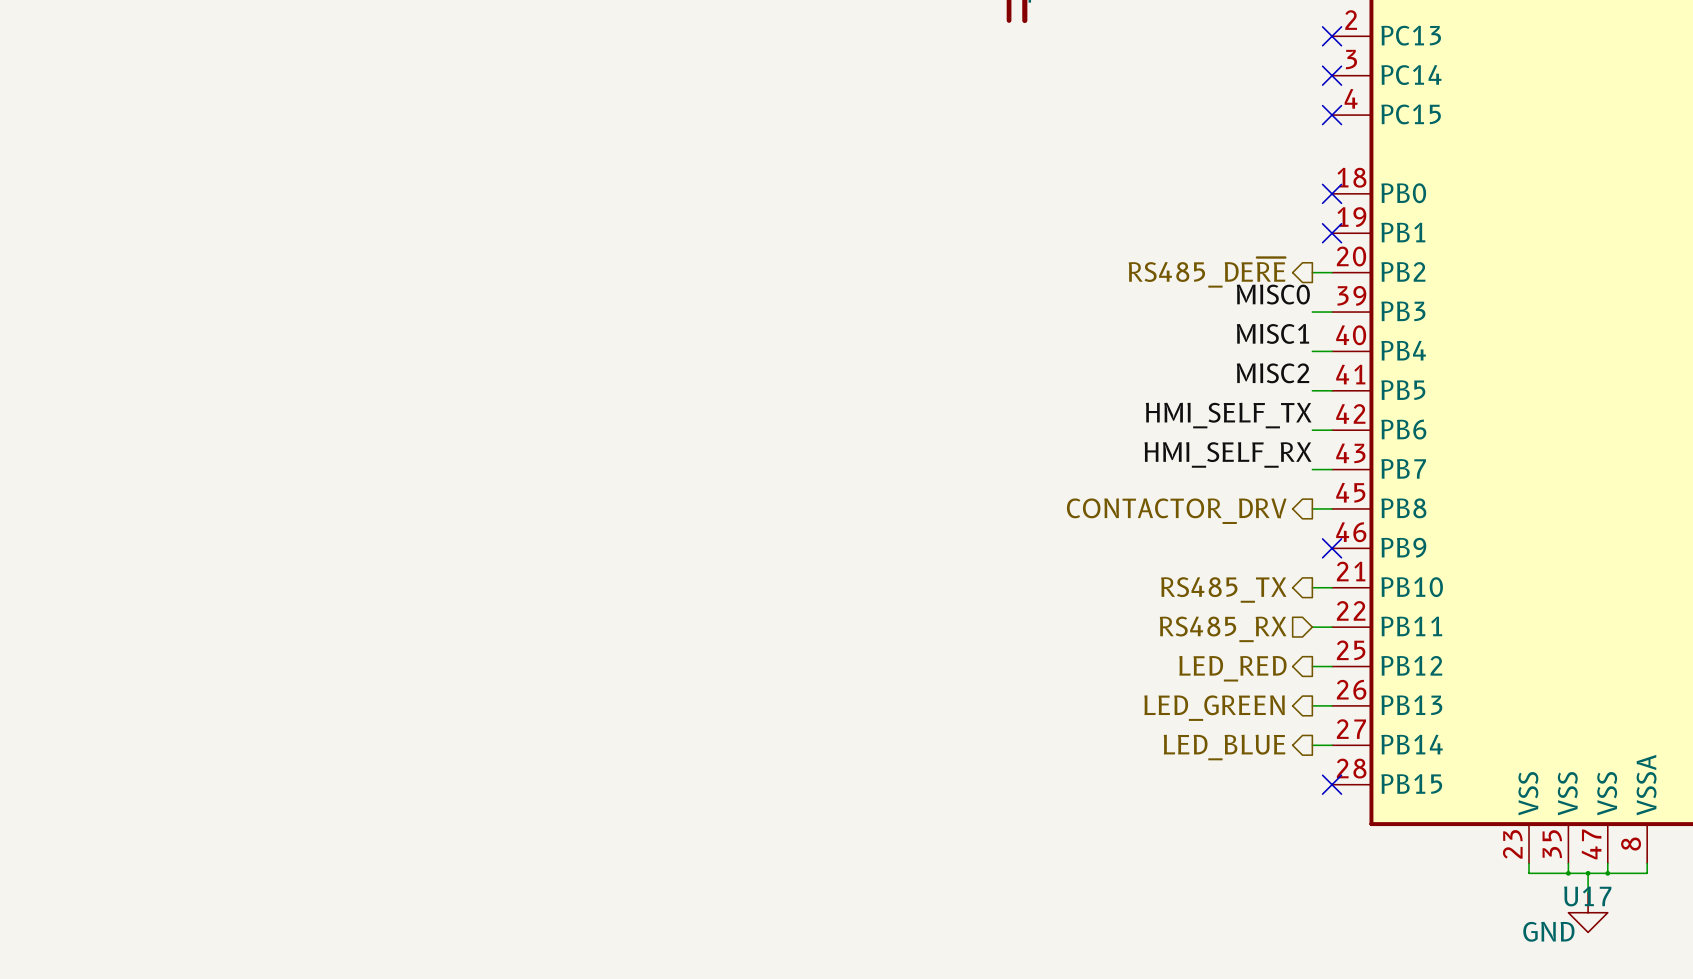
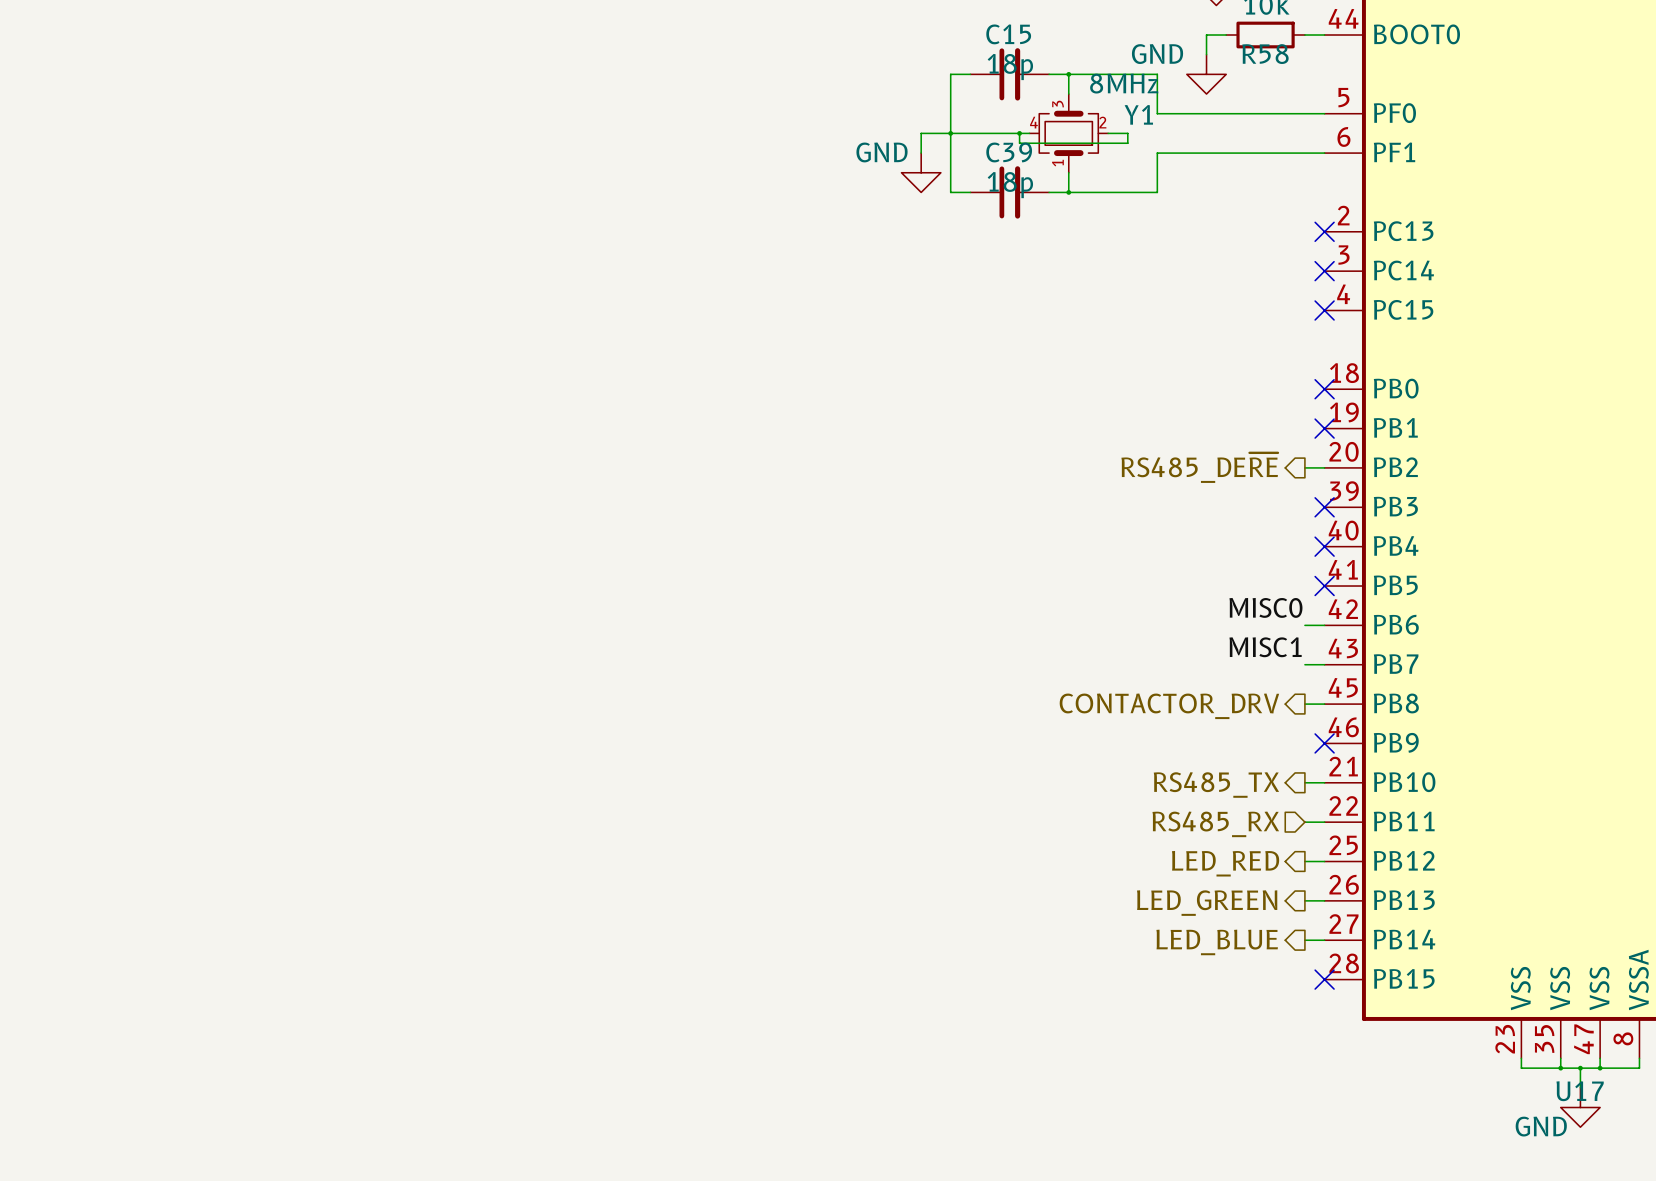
label: MISC0 (1273, 294) -> none
wire: (1312, 312) (1332, 312) -> none
no-connect mark: none -> (1324, 507)
label: MISC1 (1272, 333) -> none
wire: (1312, 351) (1332, 351) -> none
no-connect mark: none -> (1324, 546)
label: MISC2 (1273, 373) -> none
wire: (1312, 390) (1332, 390) -> none
no-connect mark: none -> (1324, 586)
label: HMI_SELF_TX (1228, 415) -> MISC0 (1265, 607)
label: HMI_SELF_RX (1228, 454) -> MISC1 (1265, 647)

